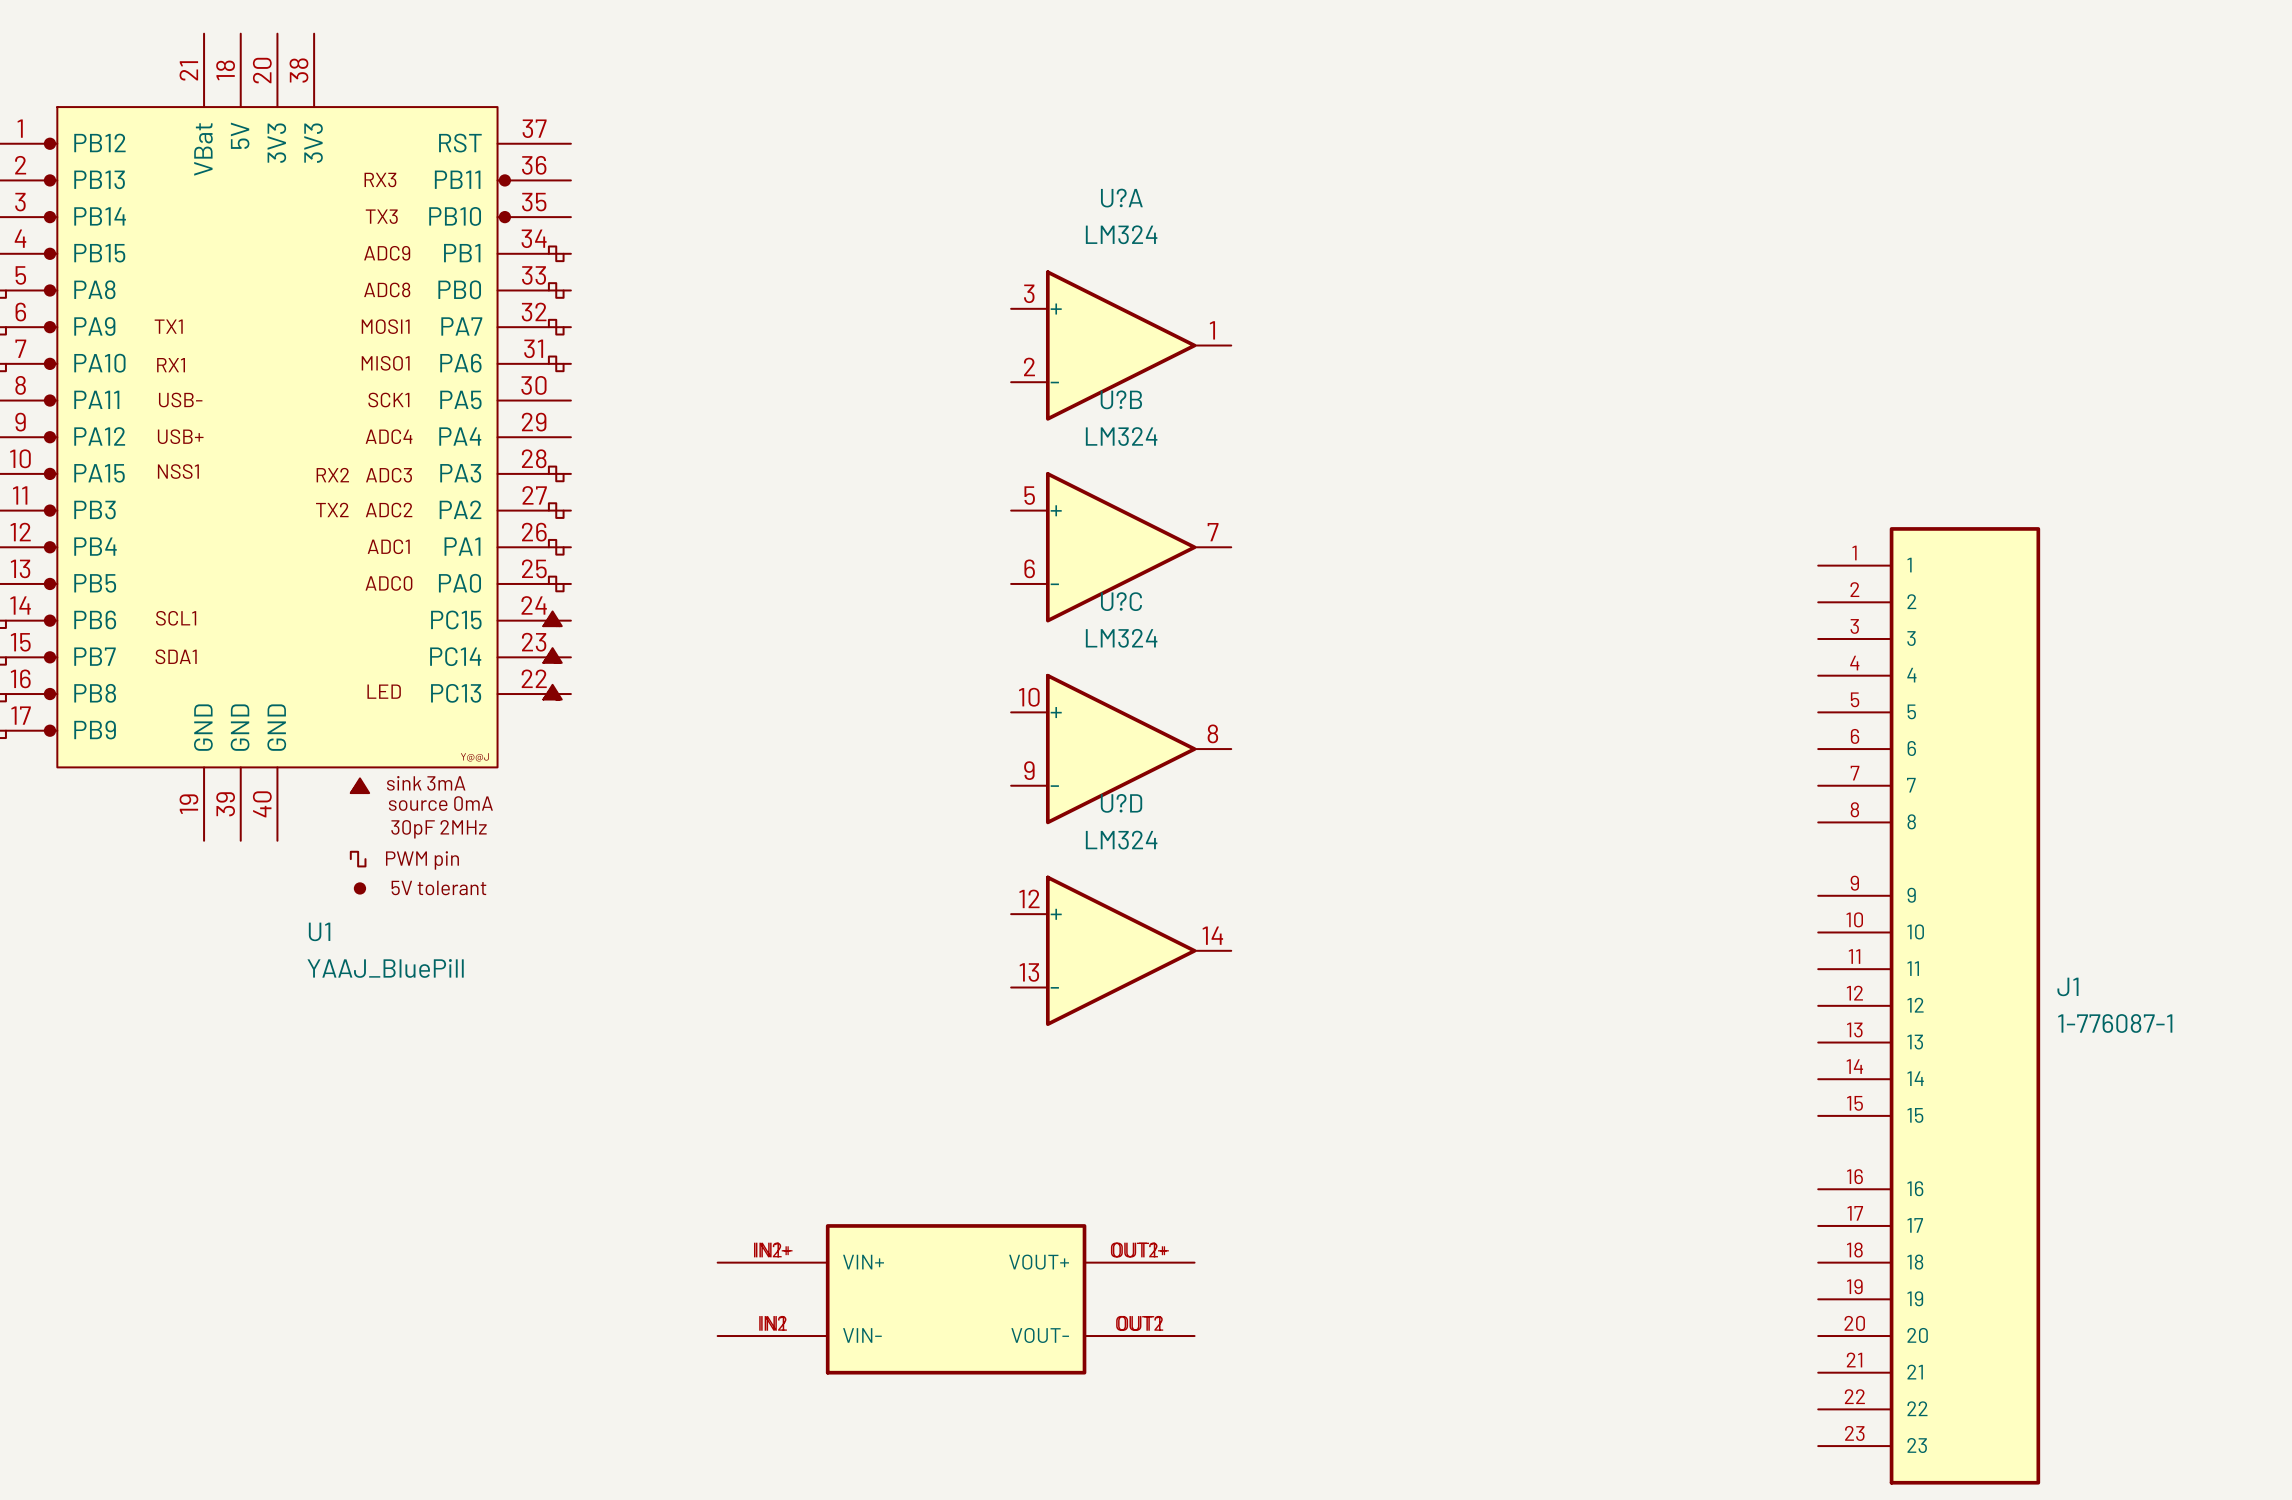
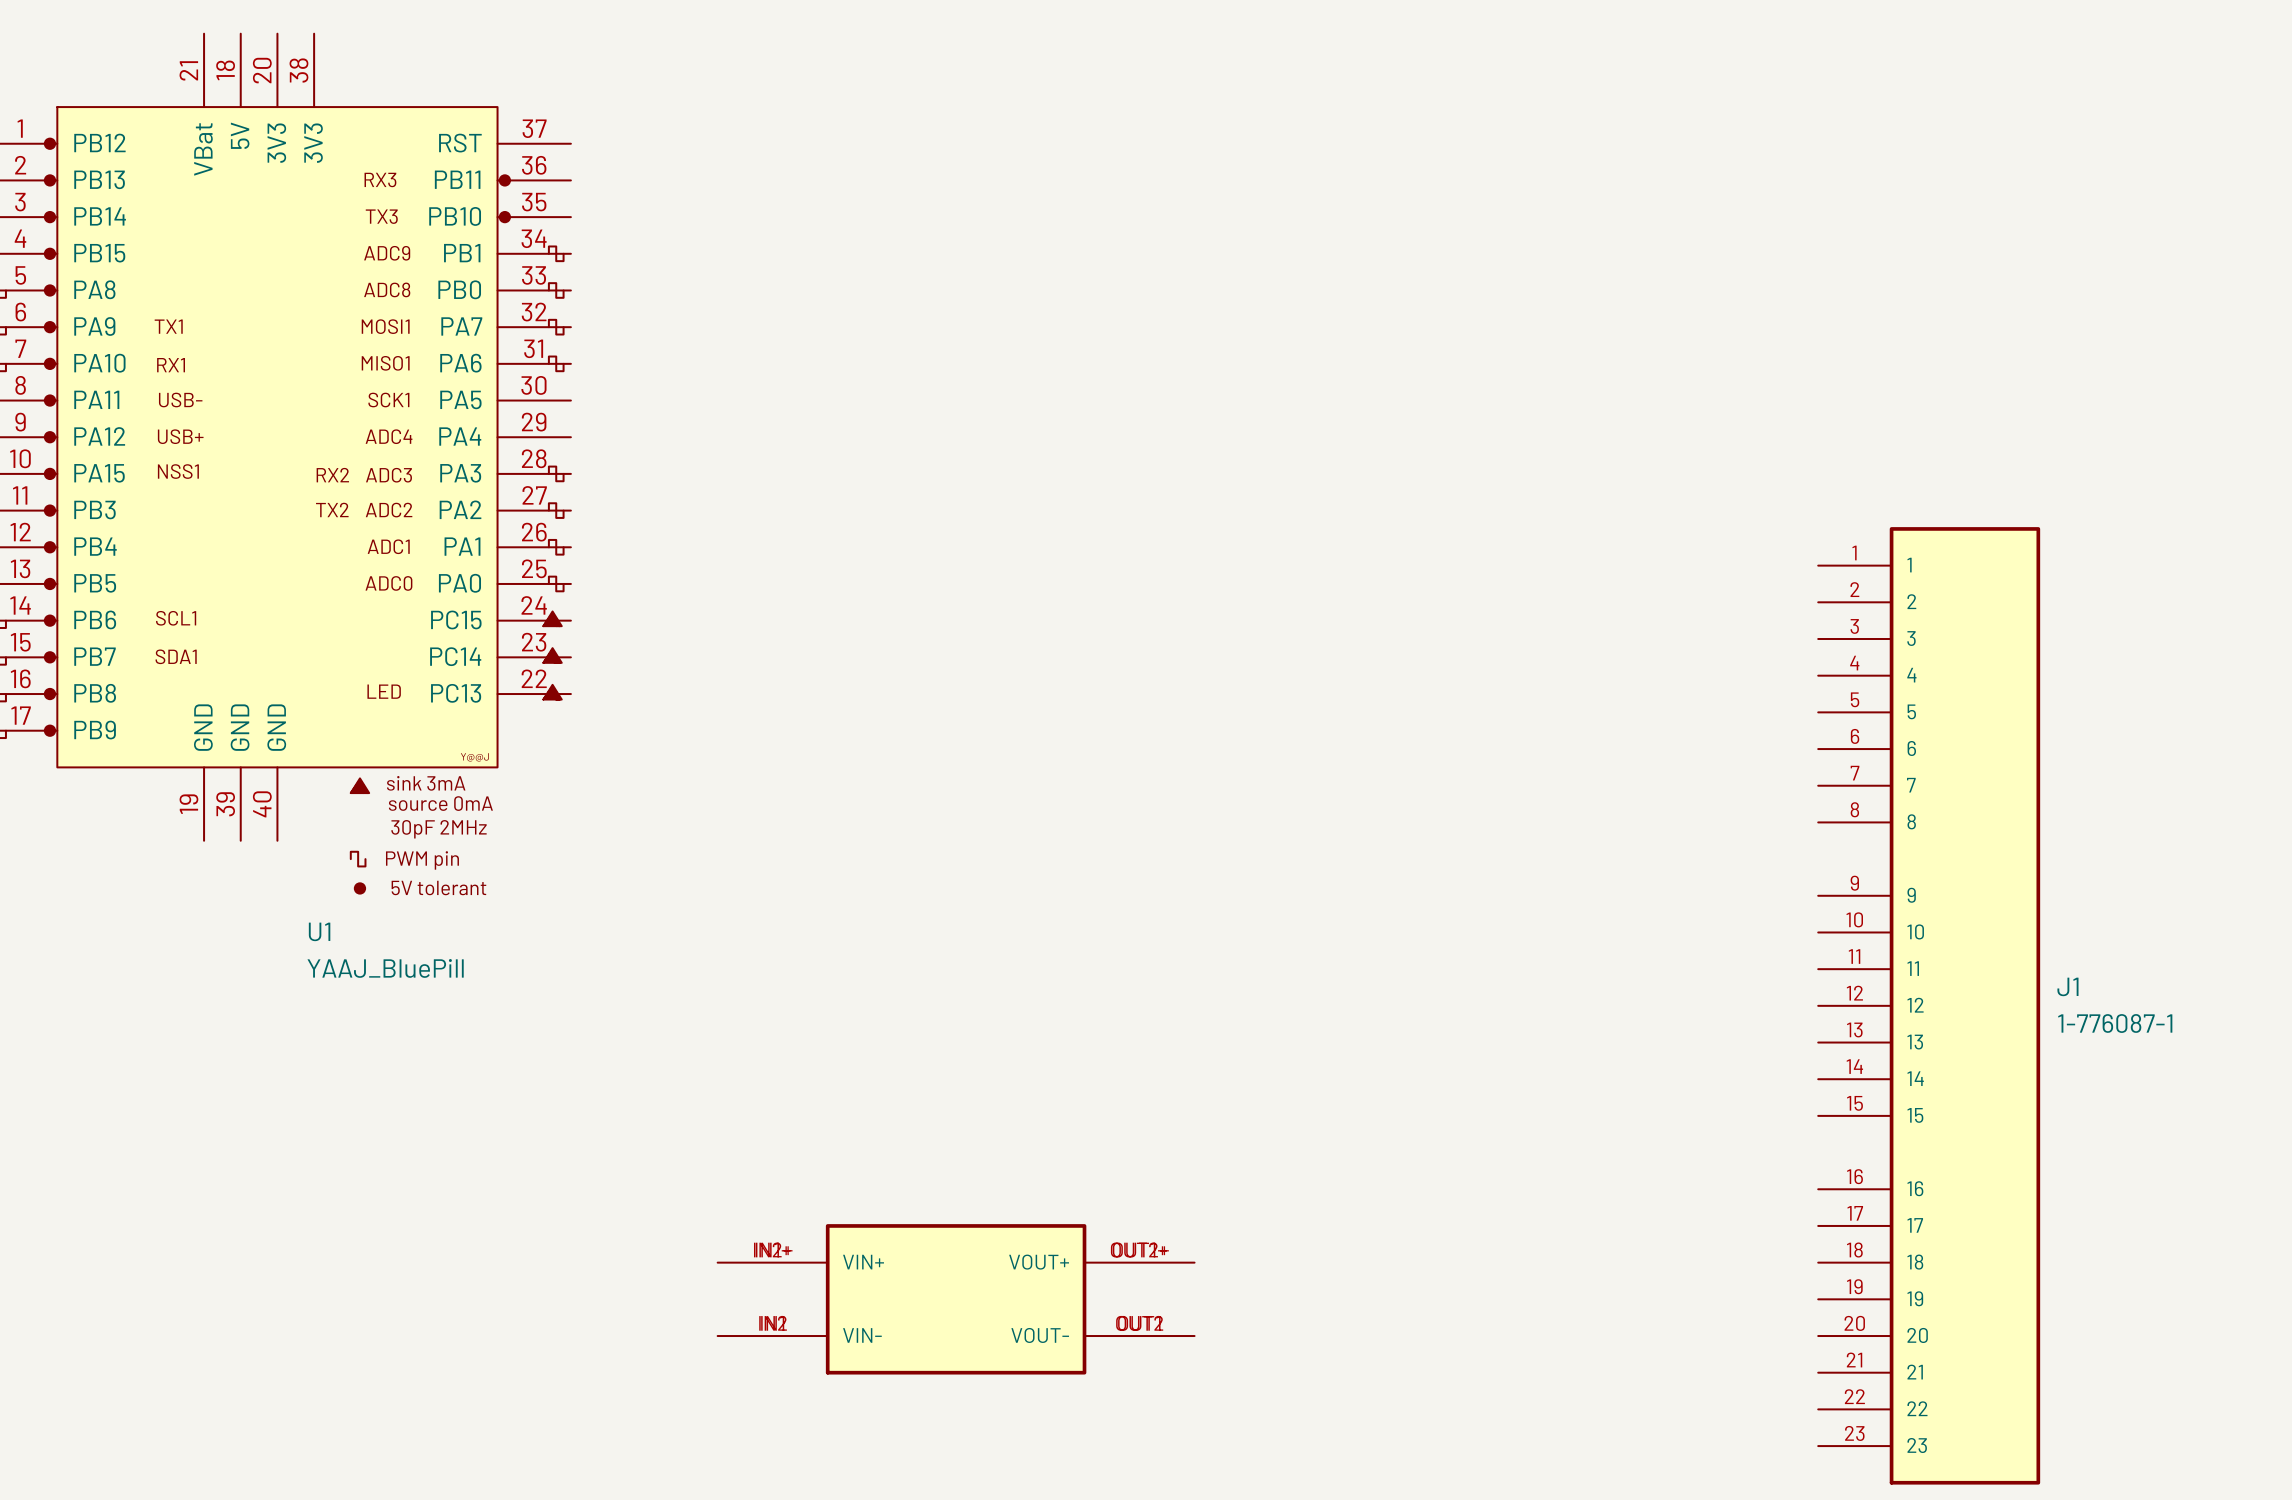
U?A: LM324 (1121, 345) -> none
U?B: LM324 (1121, 547) -> none
U?C: LM324 (1121, 749) -> none
U?D: LM324 (1121, 950) -> none

